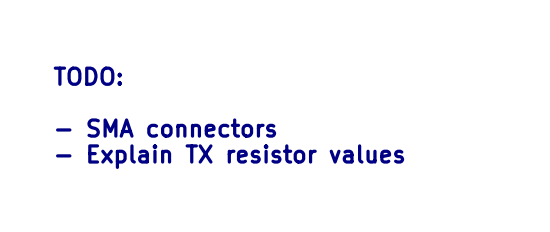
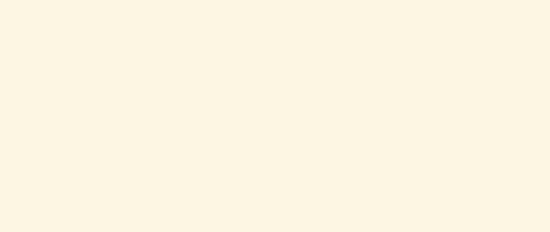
text: TODO: (87, 76) -> none
text: - SMA connectors (166, 128) -> none
text: - Explain TX resistor values (230, 156) -> none

